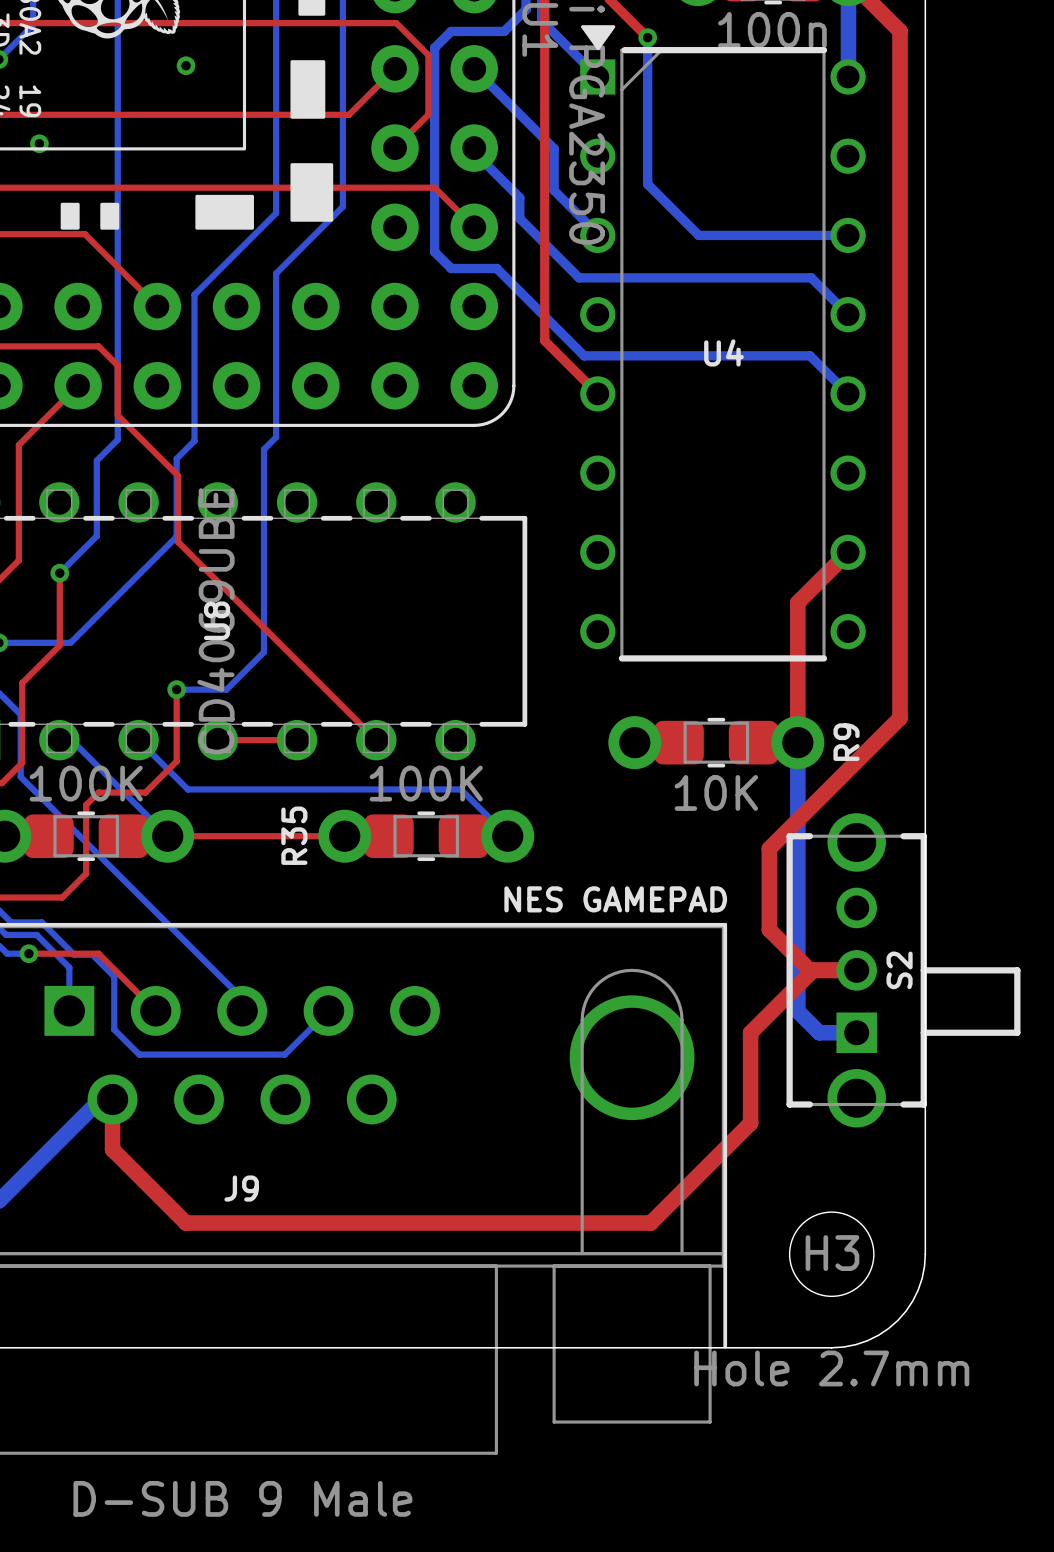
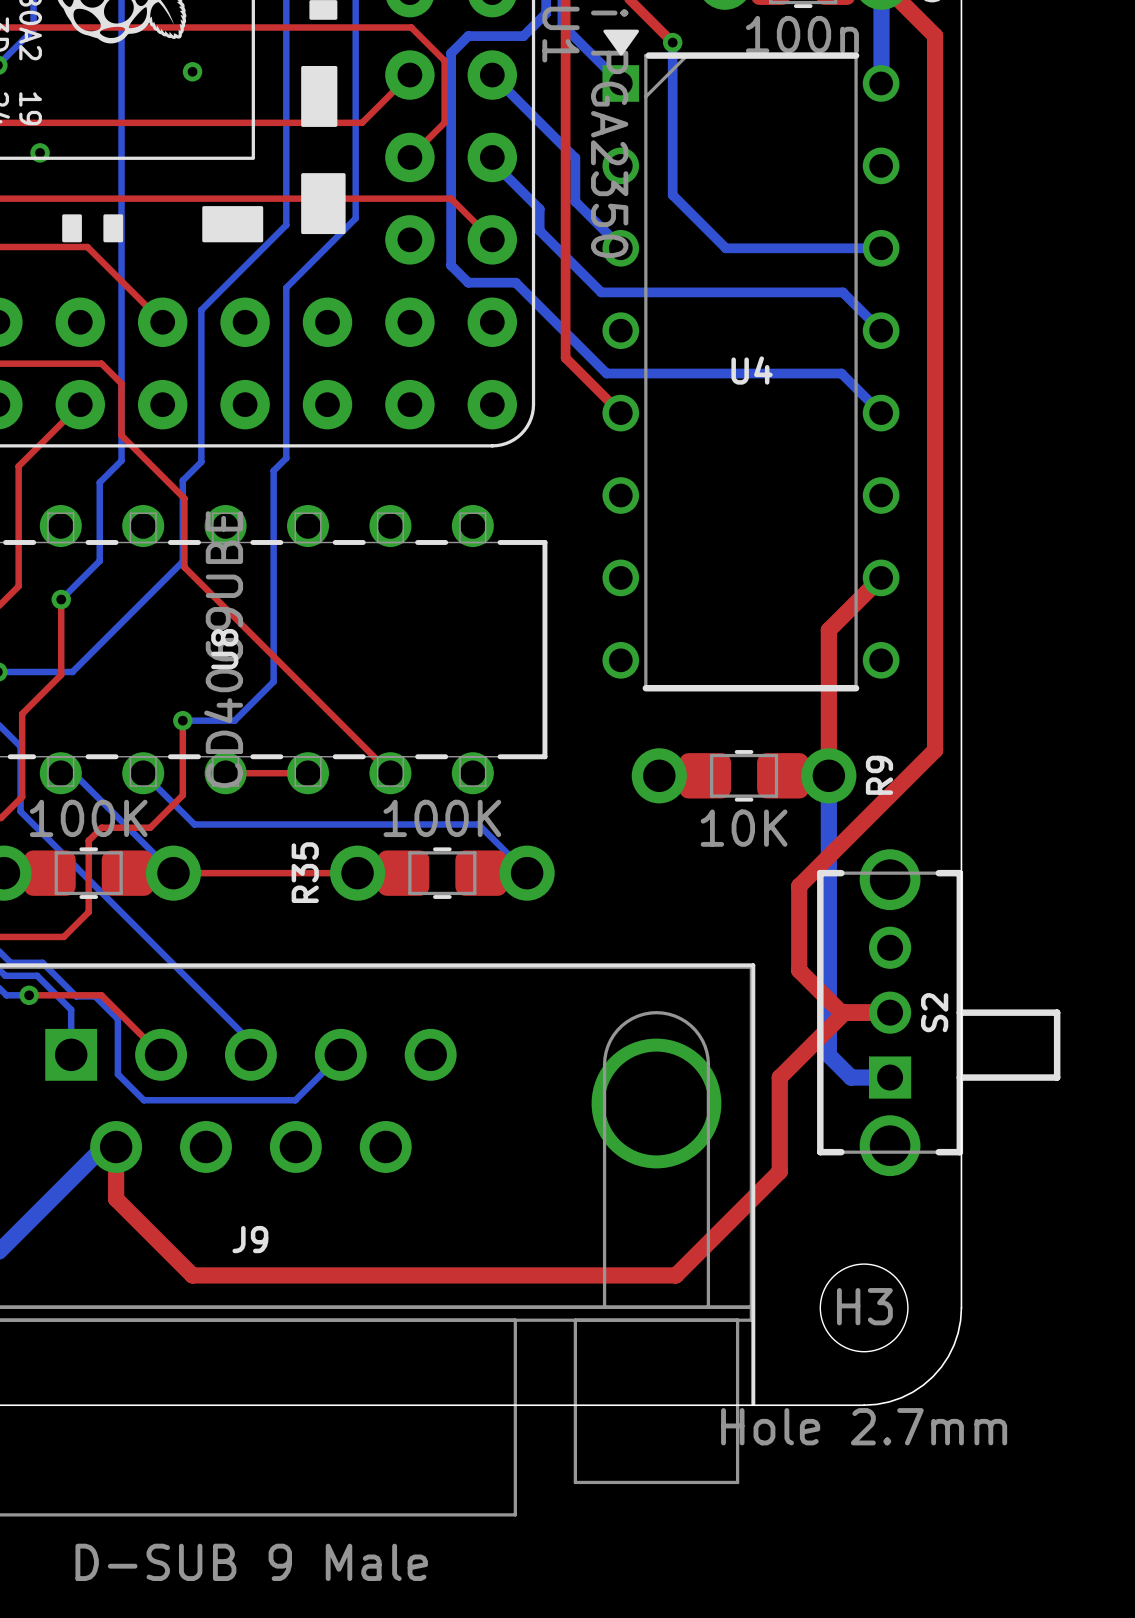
text: NES GAMEPAD (615, 899) -> none

